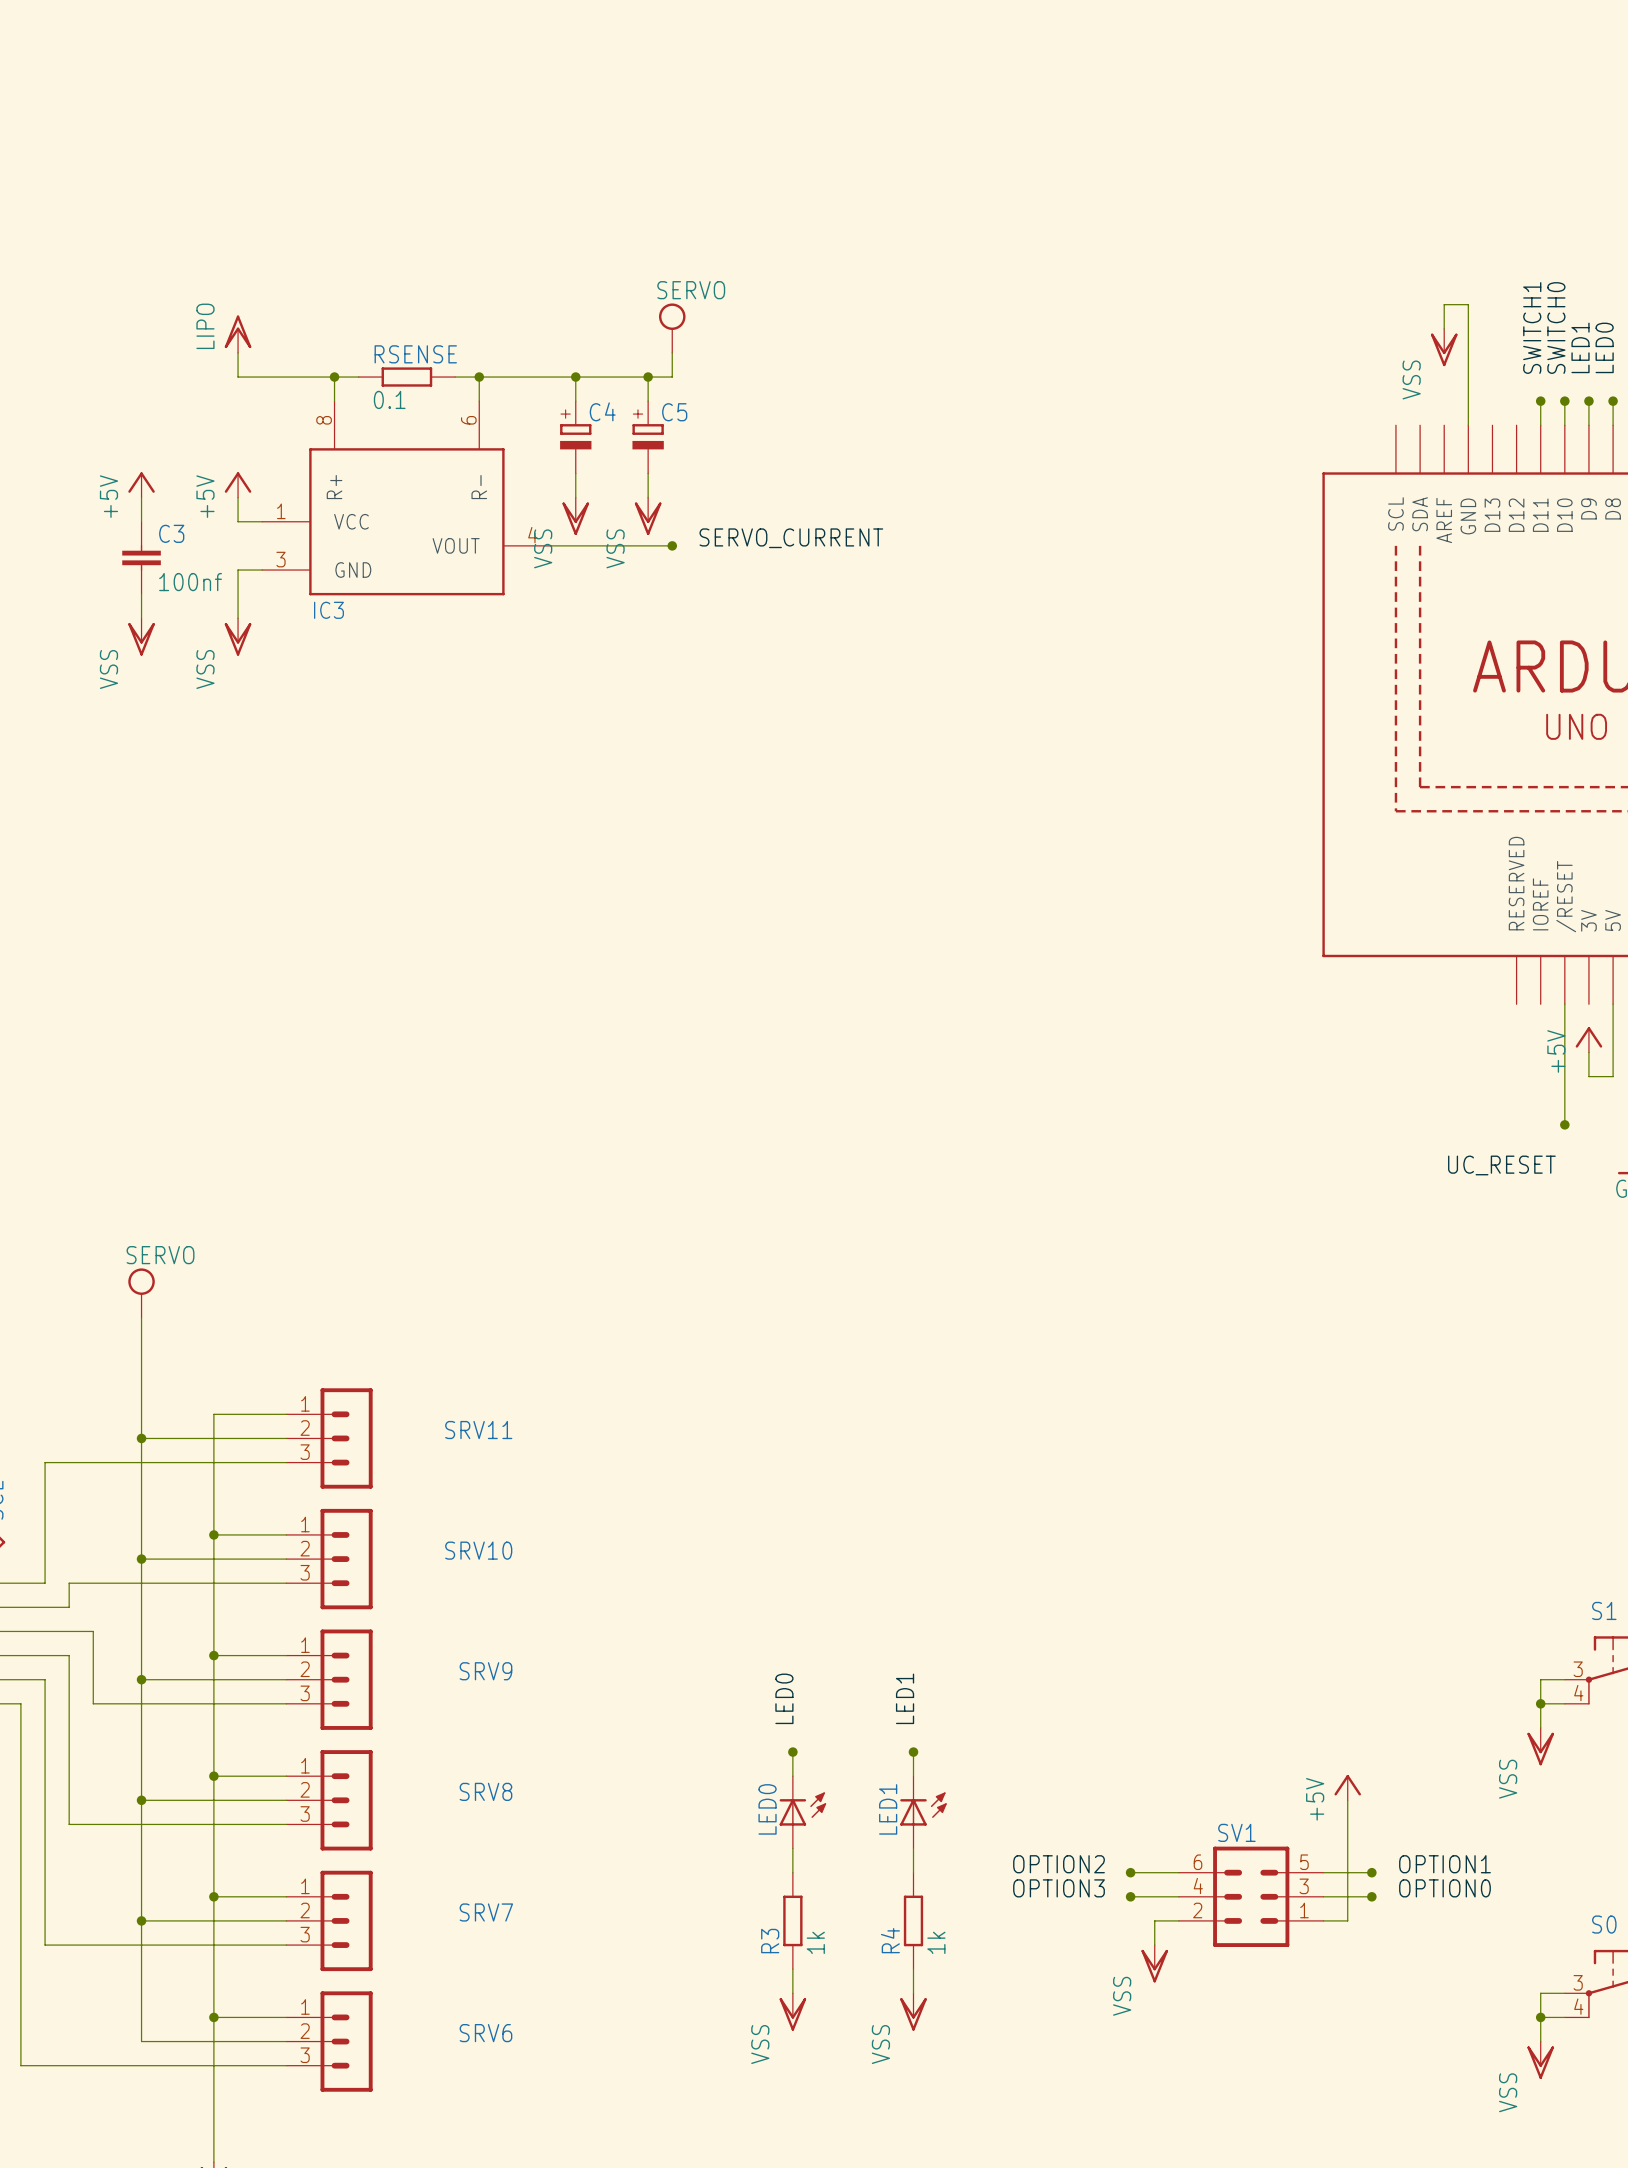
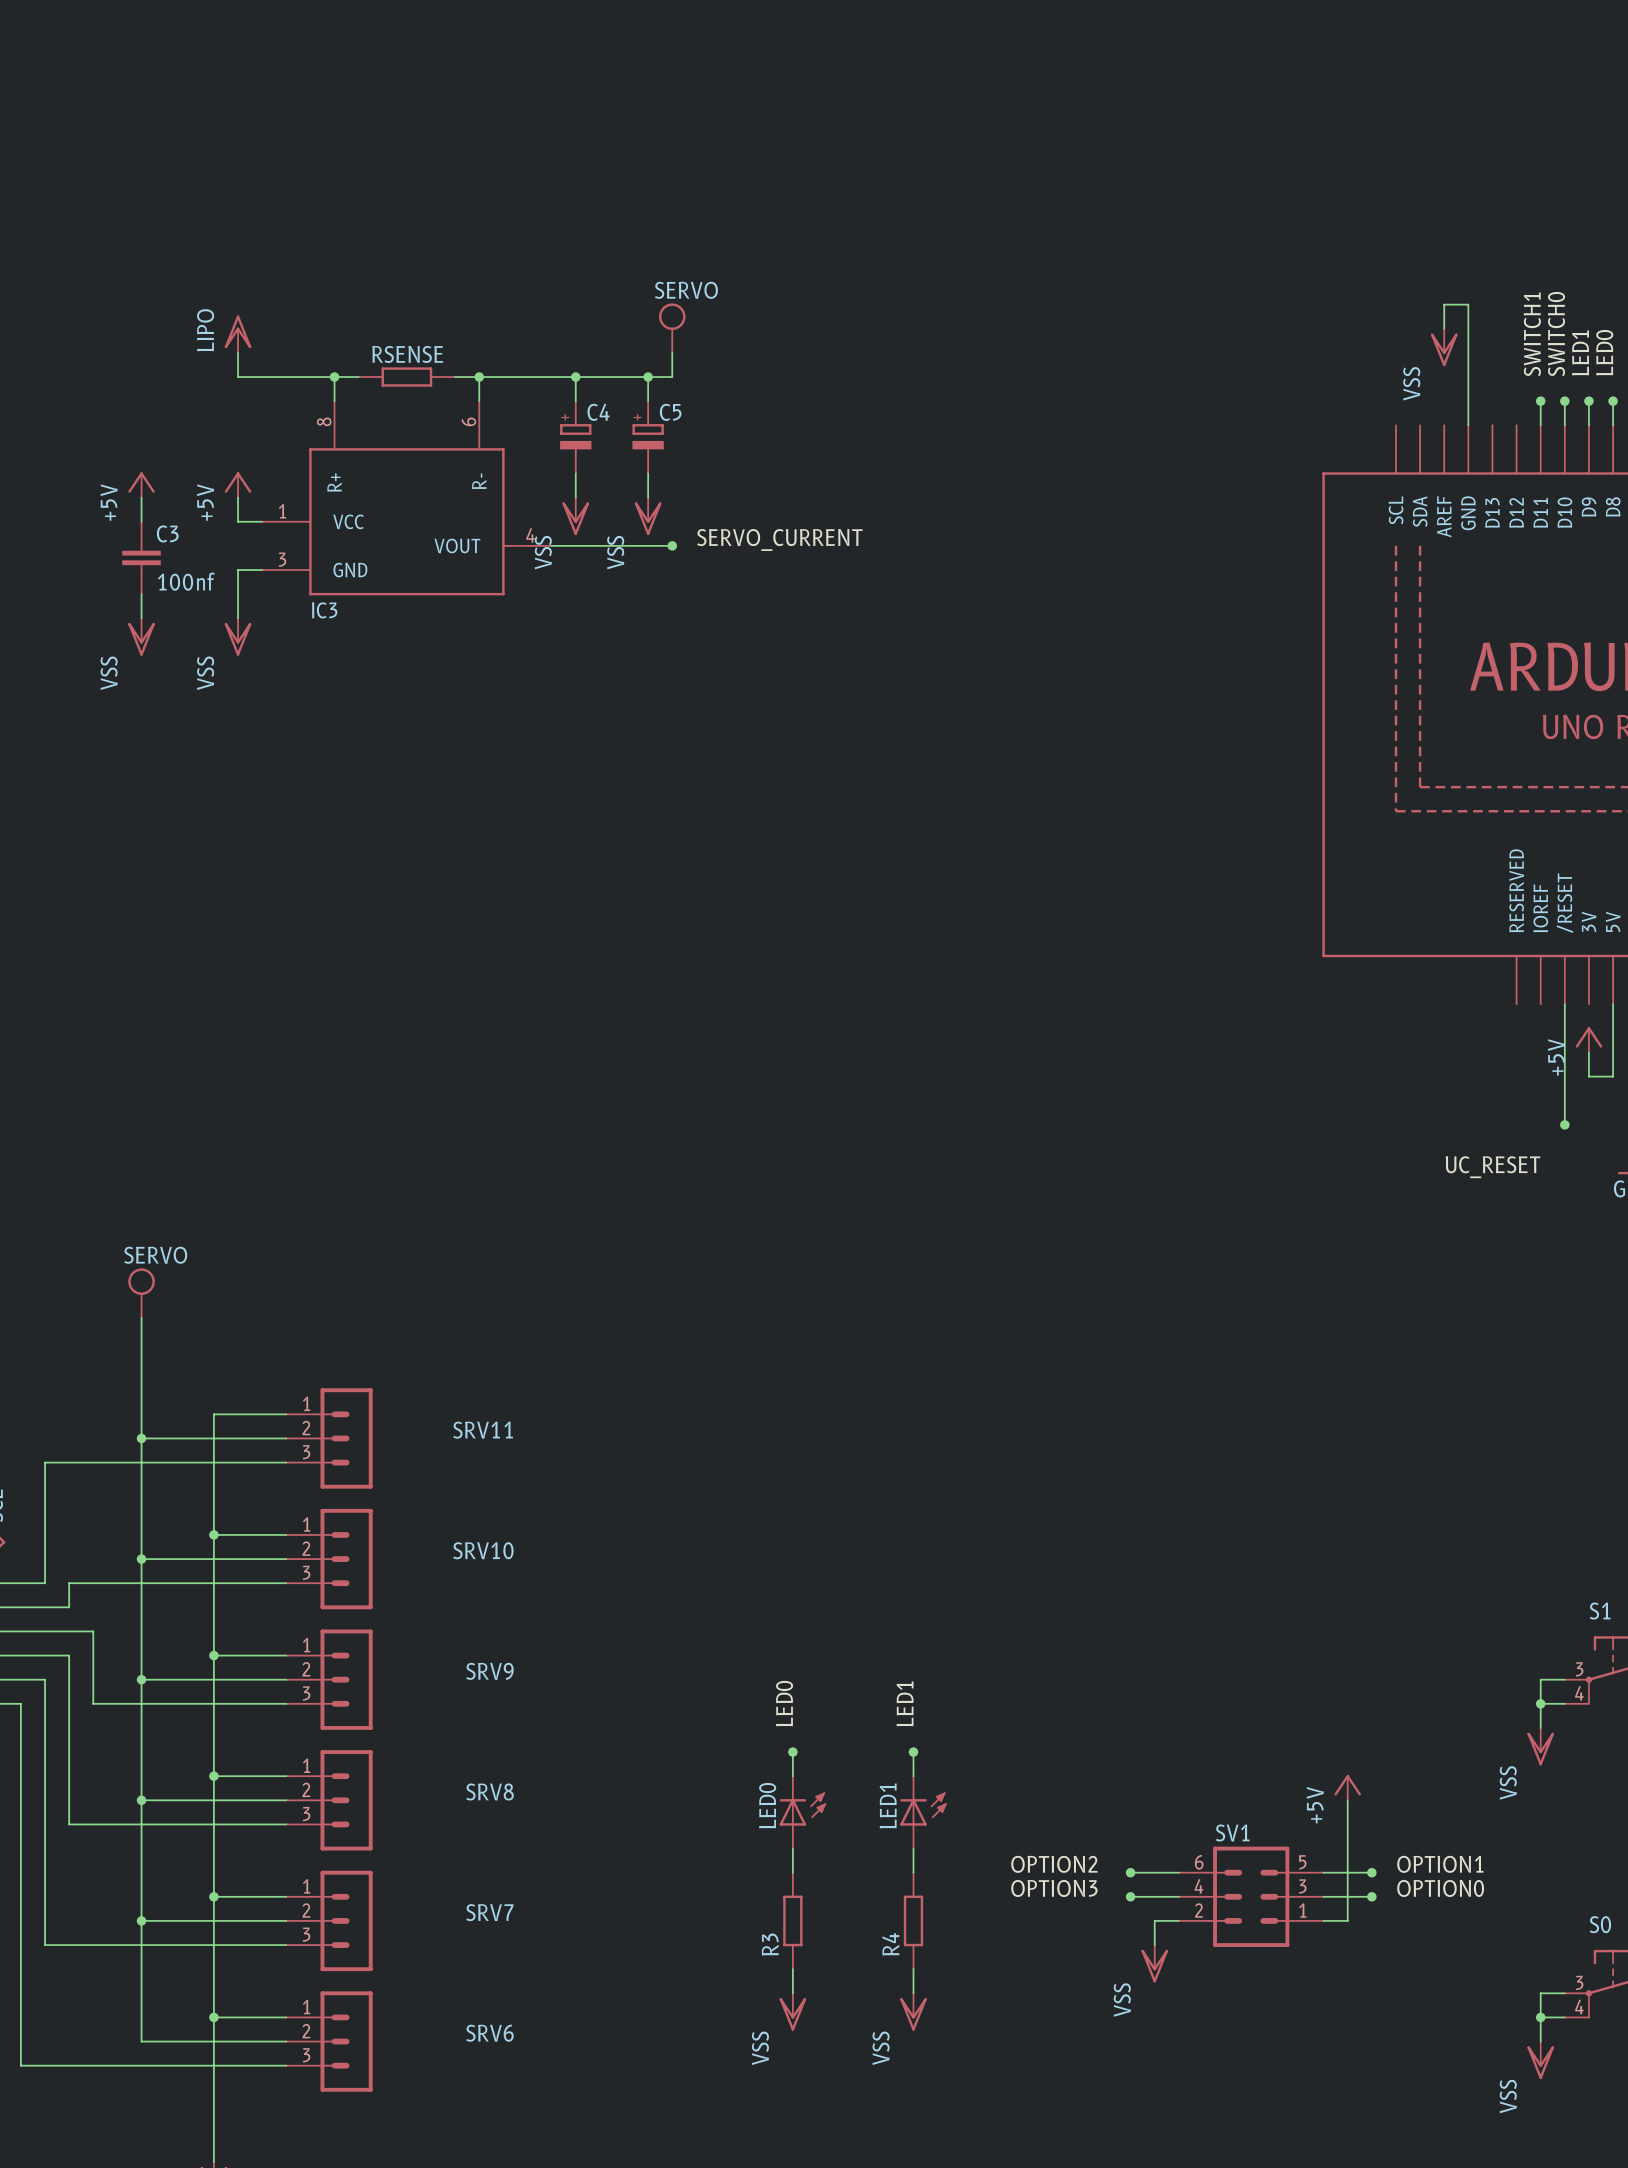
RSENSE value: 0.1 (389, 399) -> none
R3 value: 1k (815, 1942) -> none
R4 value: 1k (936, 1942) -> none

